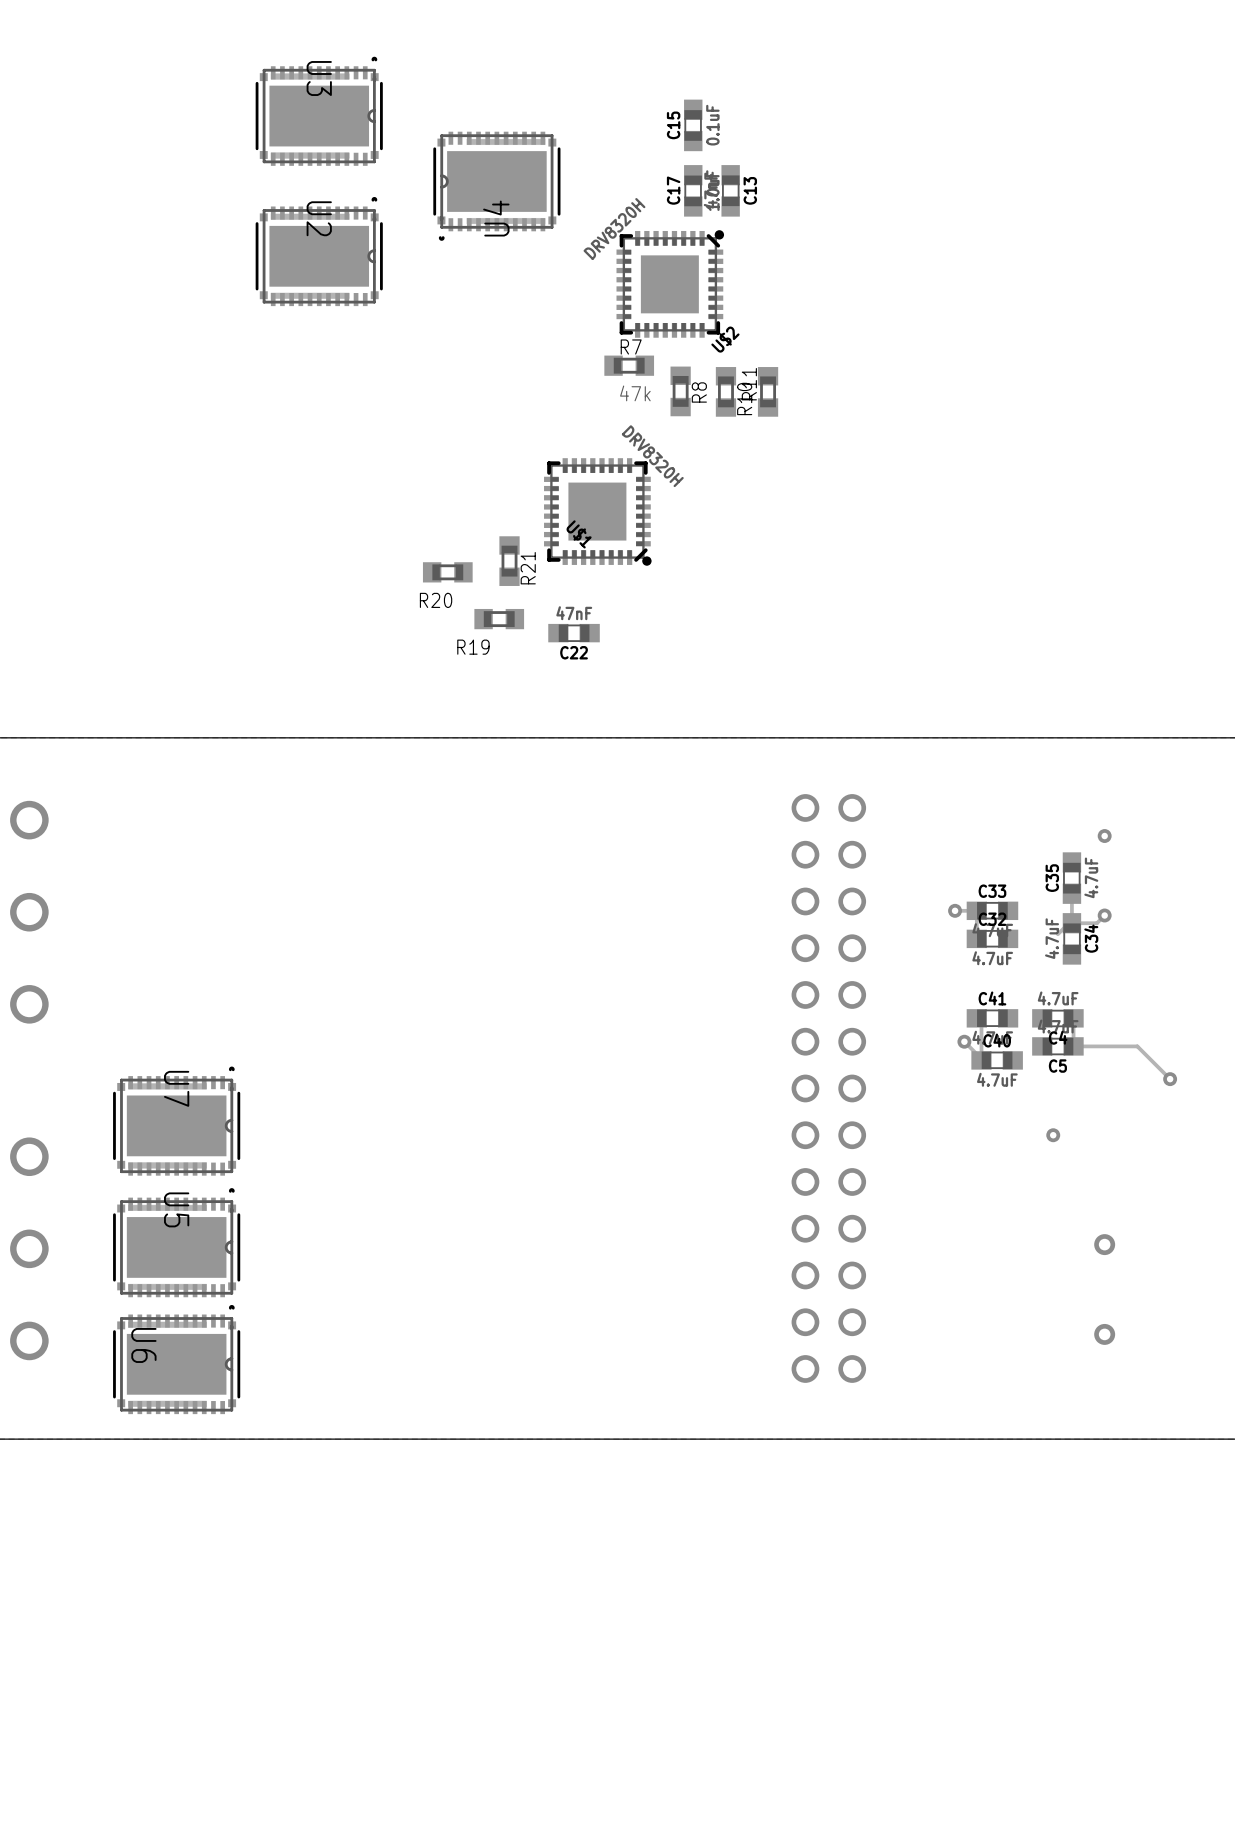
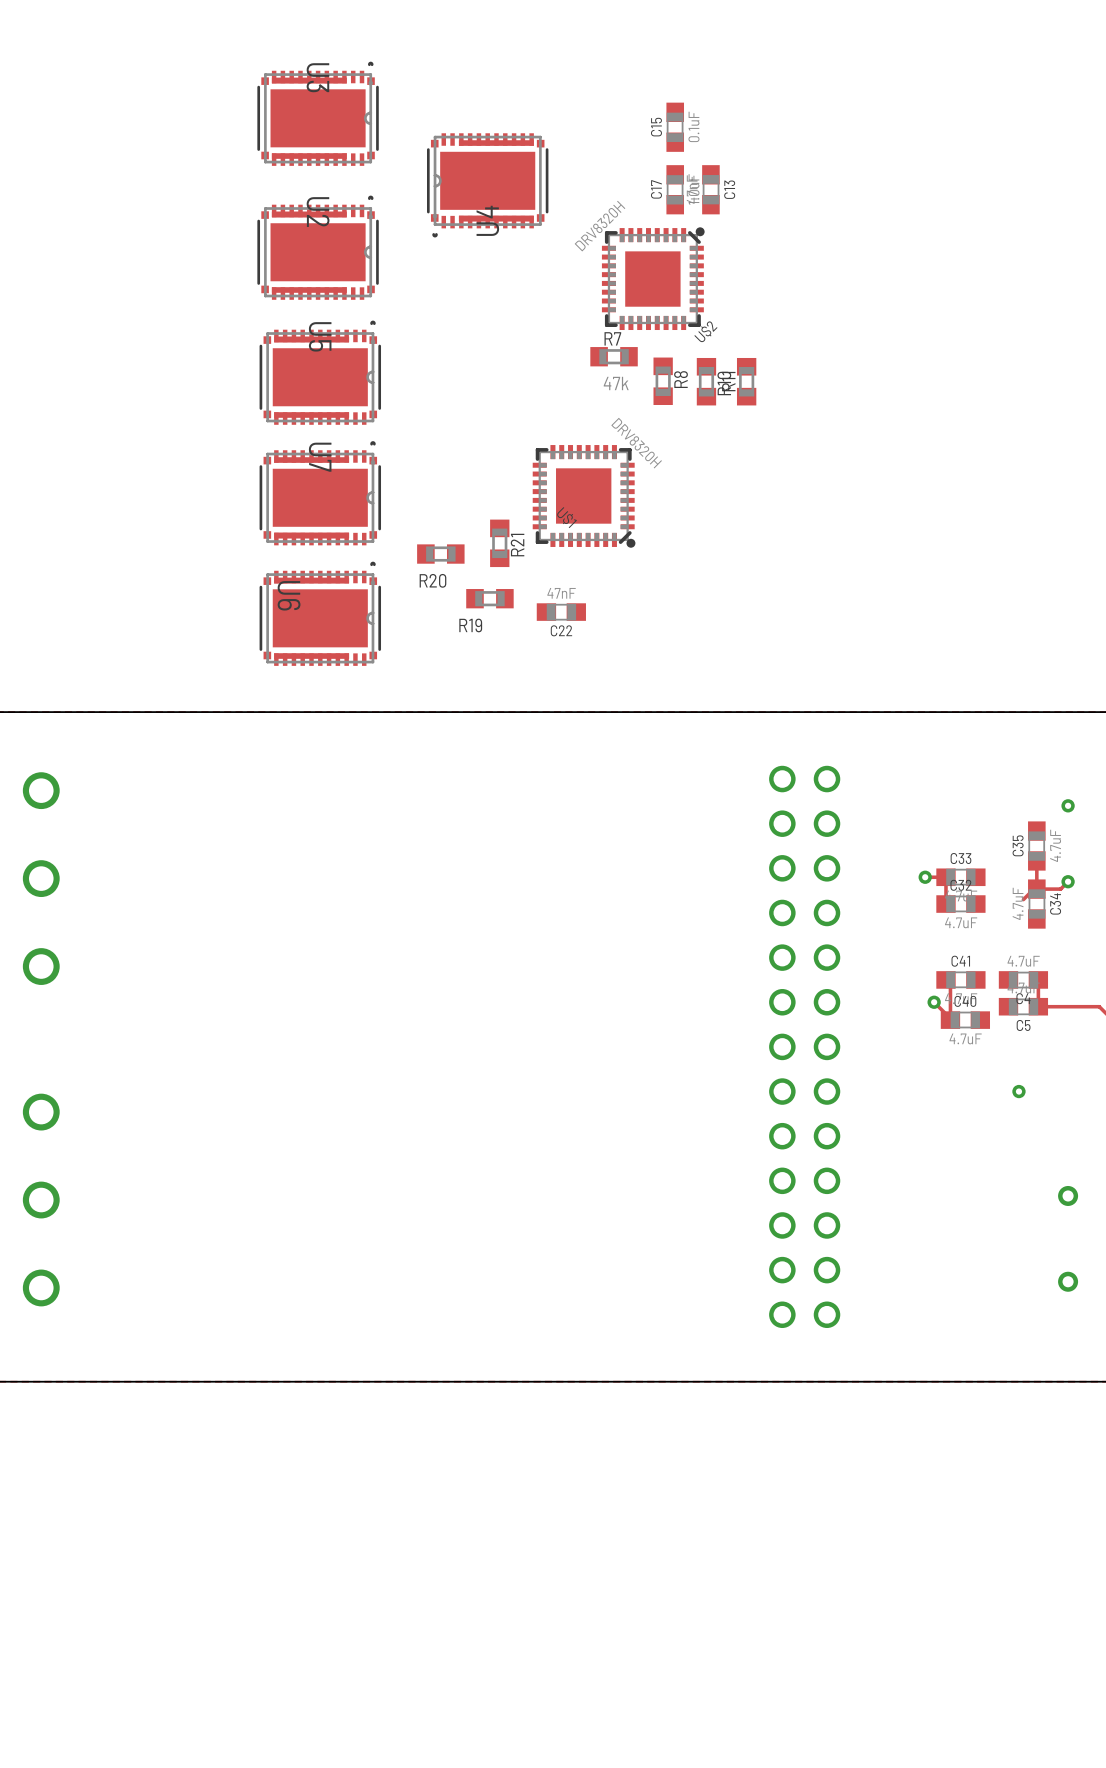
U7 position: (176, 1121) -> (320, 493)
U5 position: (176, 1242) -> (320, 372)
U6 position: (176, 1359) -> (320, 613)

